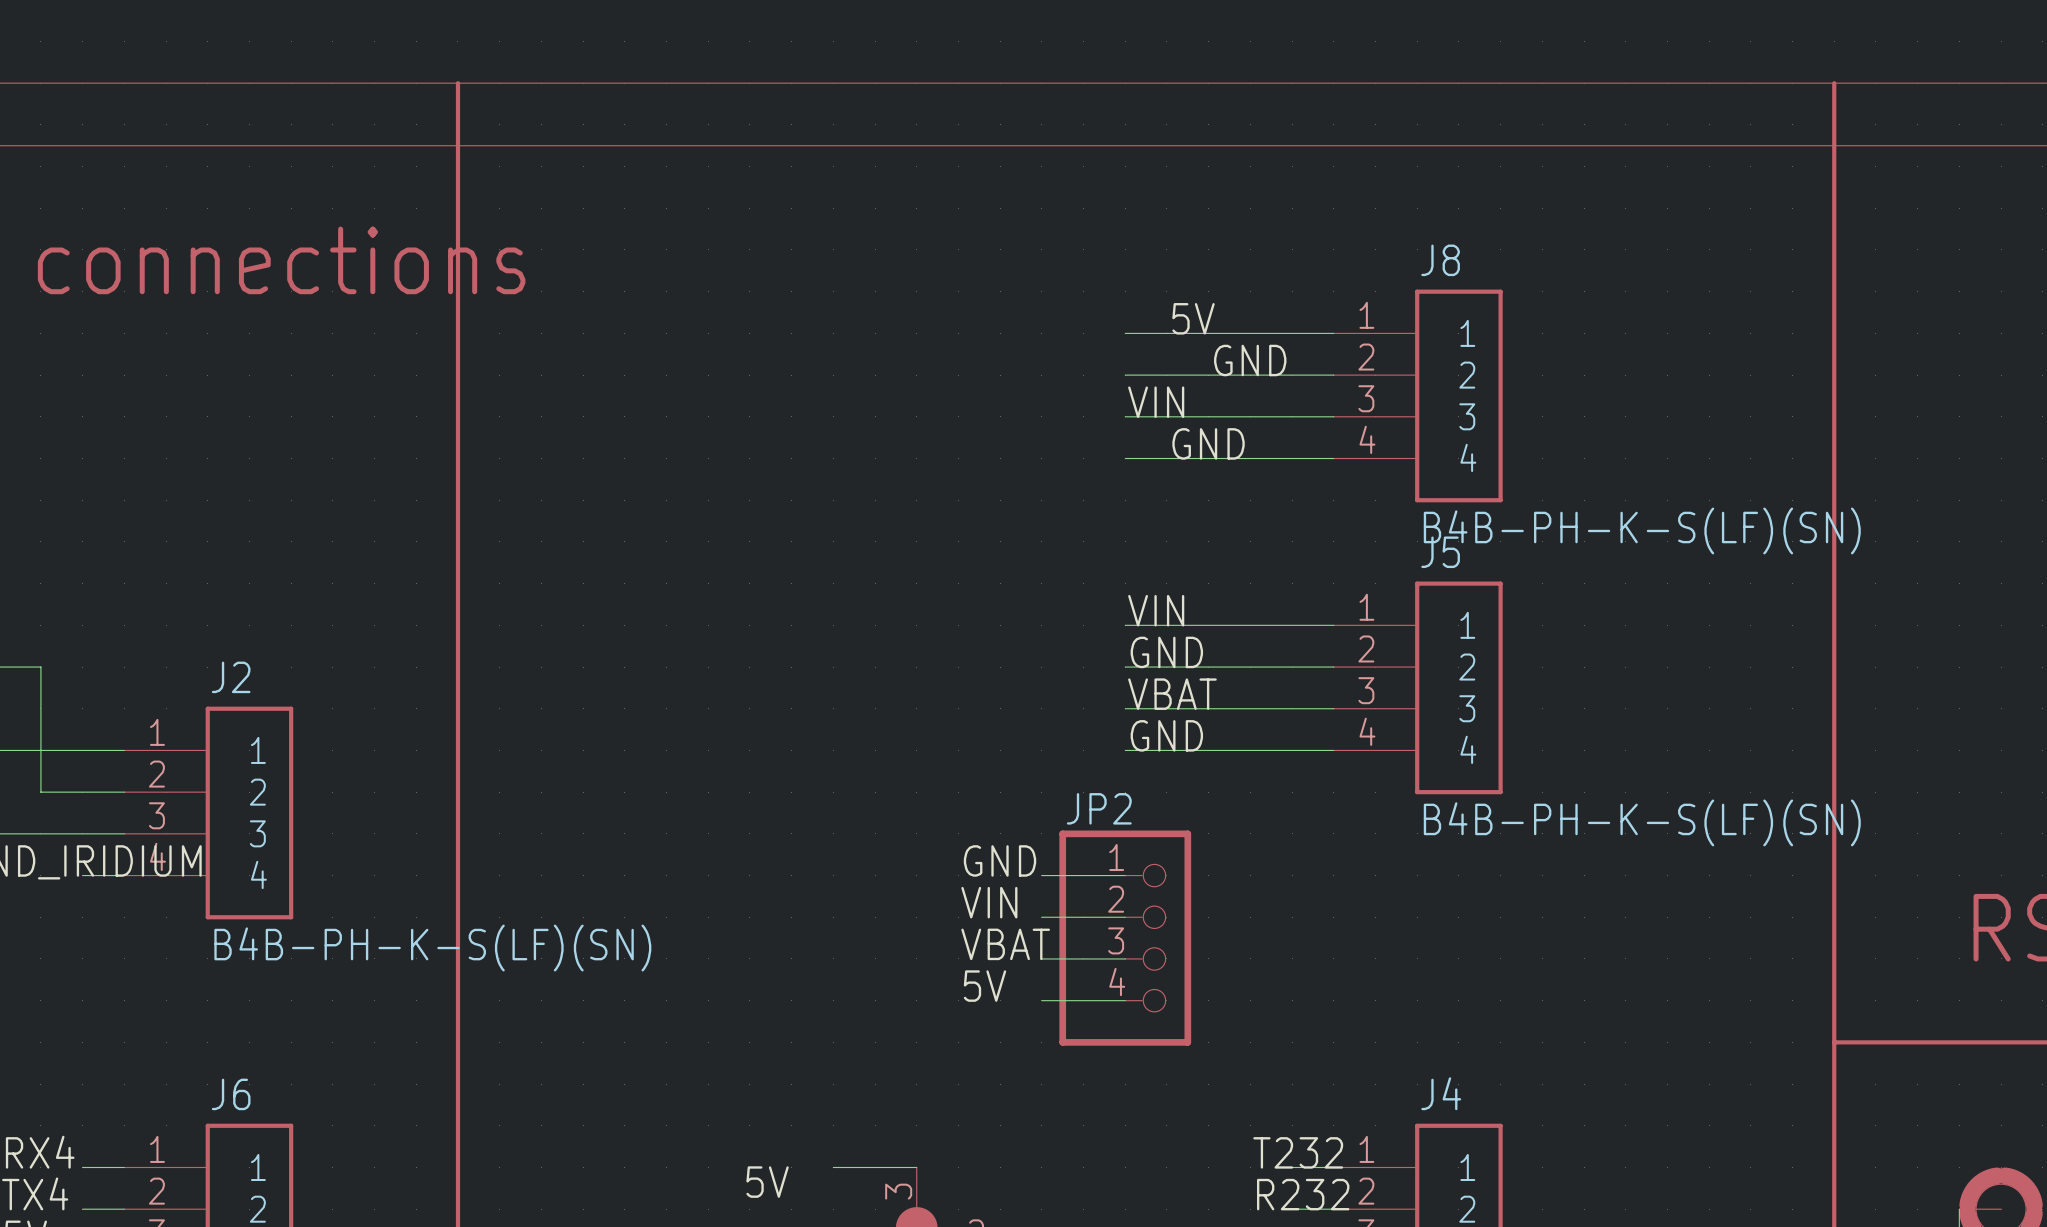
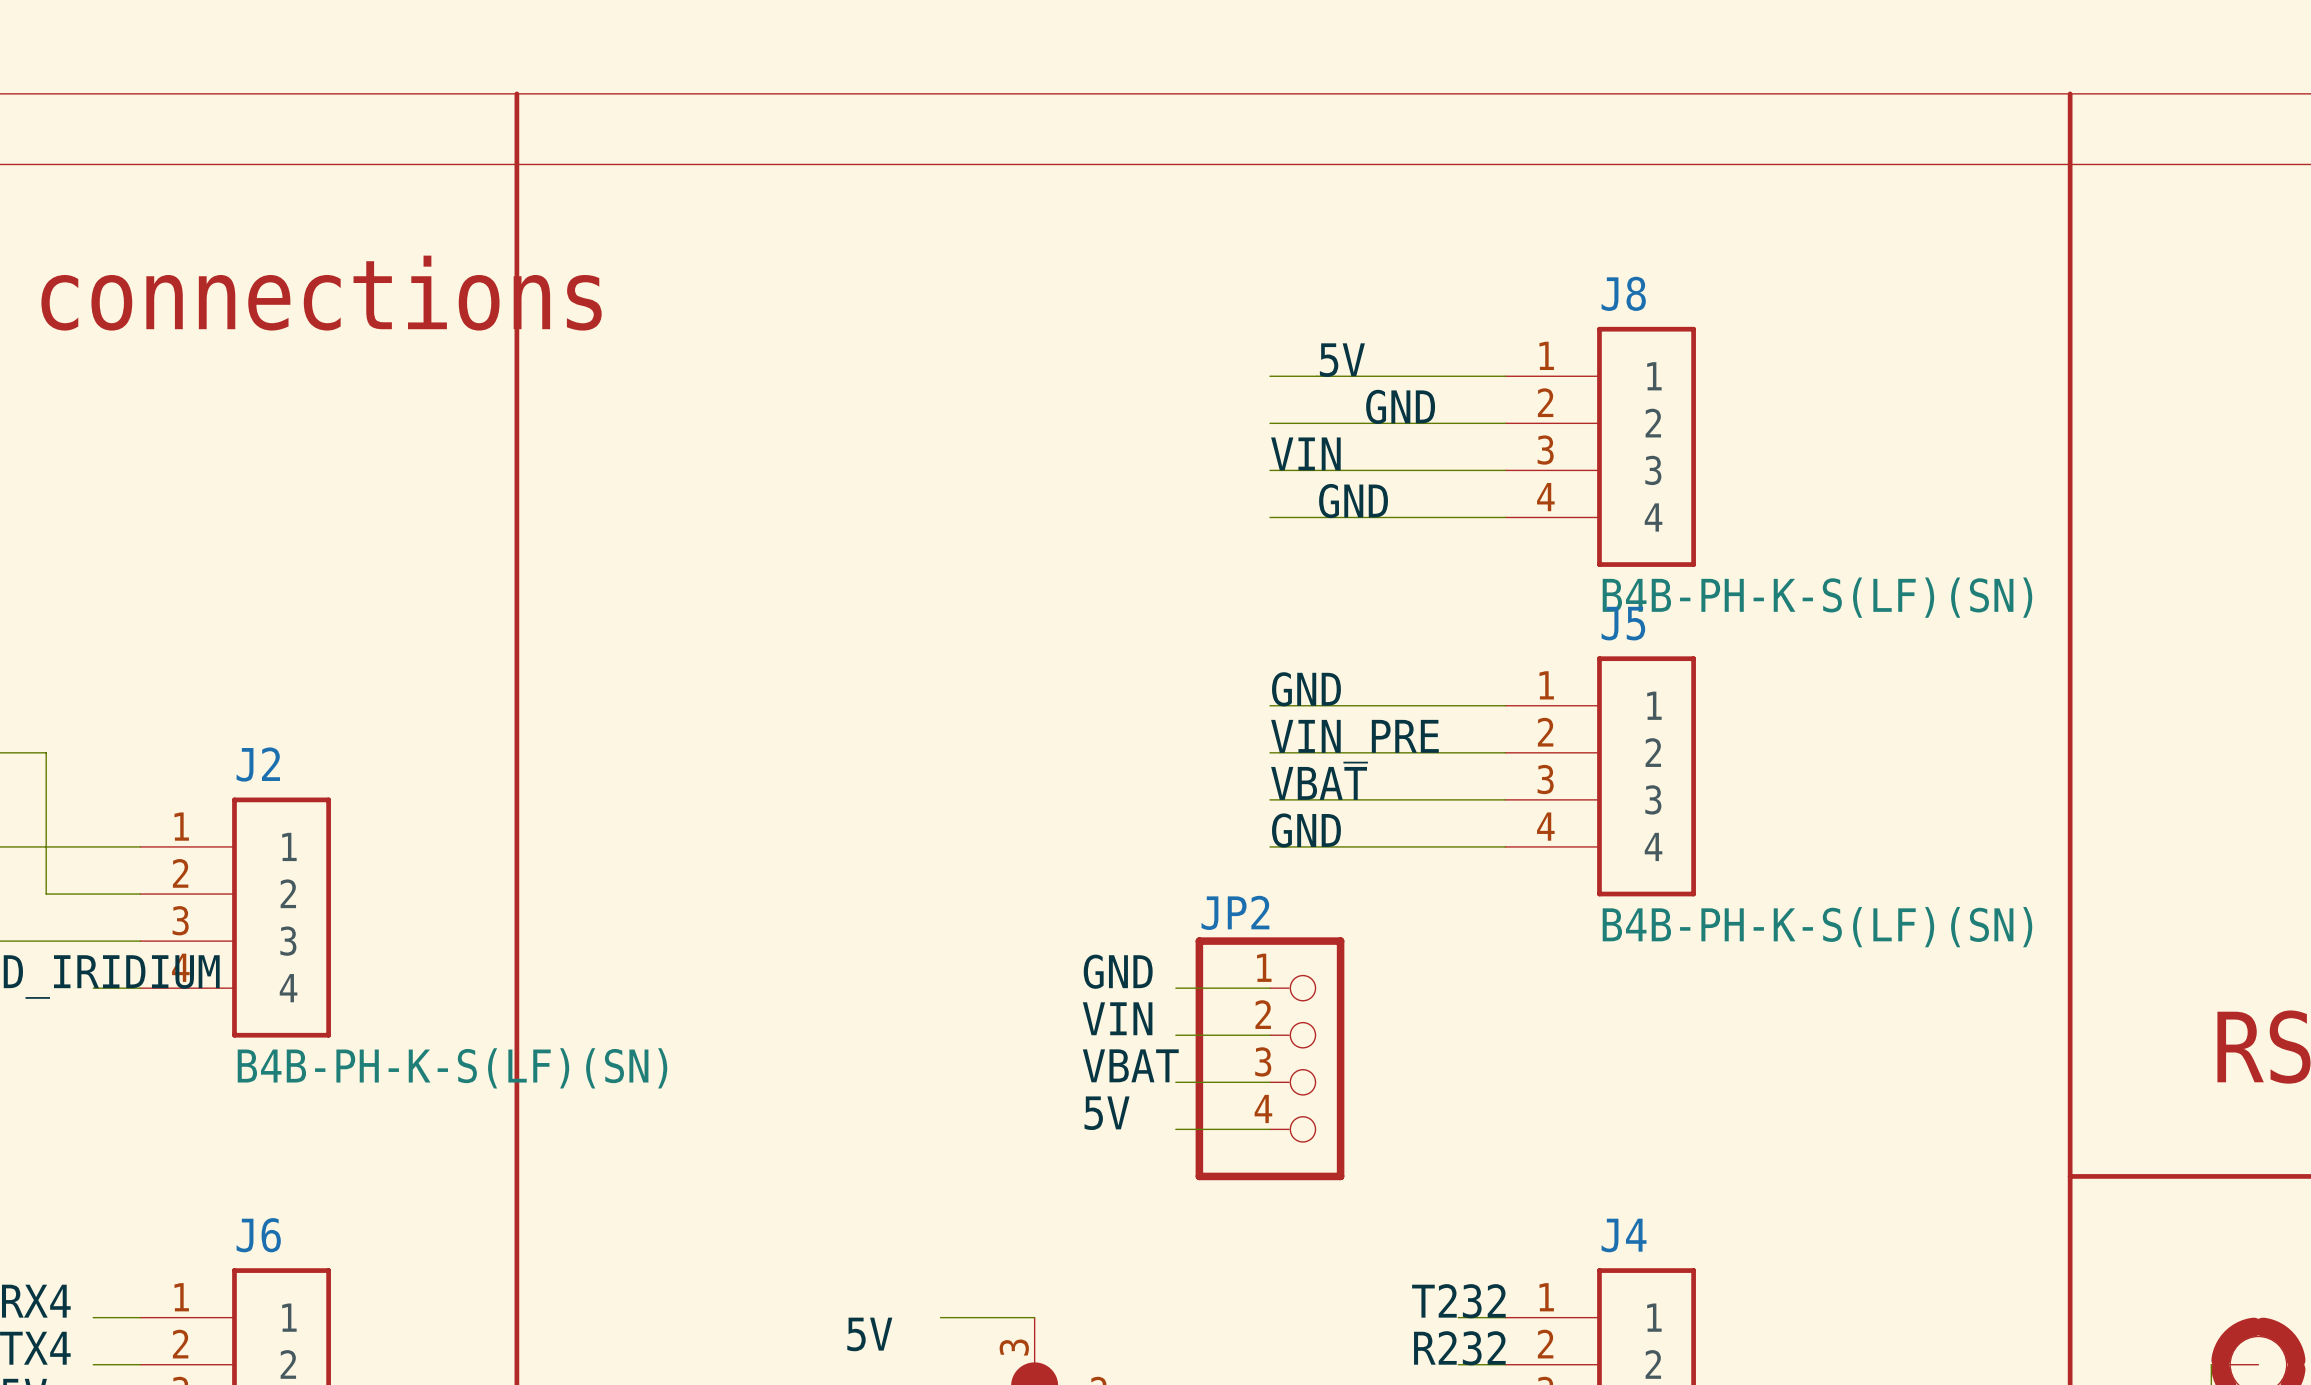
label: VIN (1156, 610) -> GND (1306, 689)
label: GND (1166, 652) -> VIN_PRE (1354, 741)

